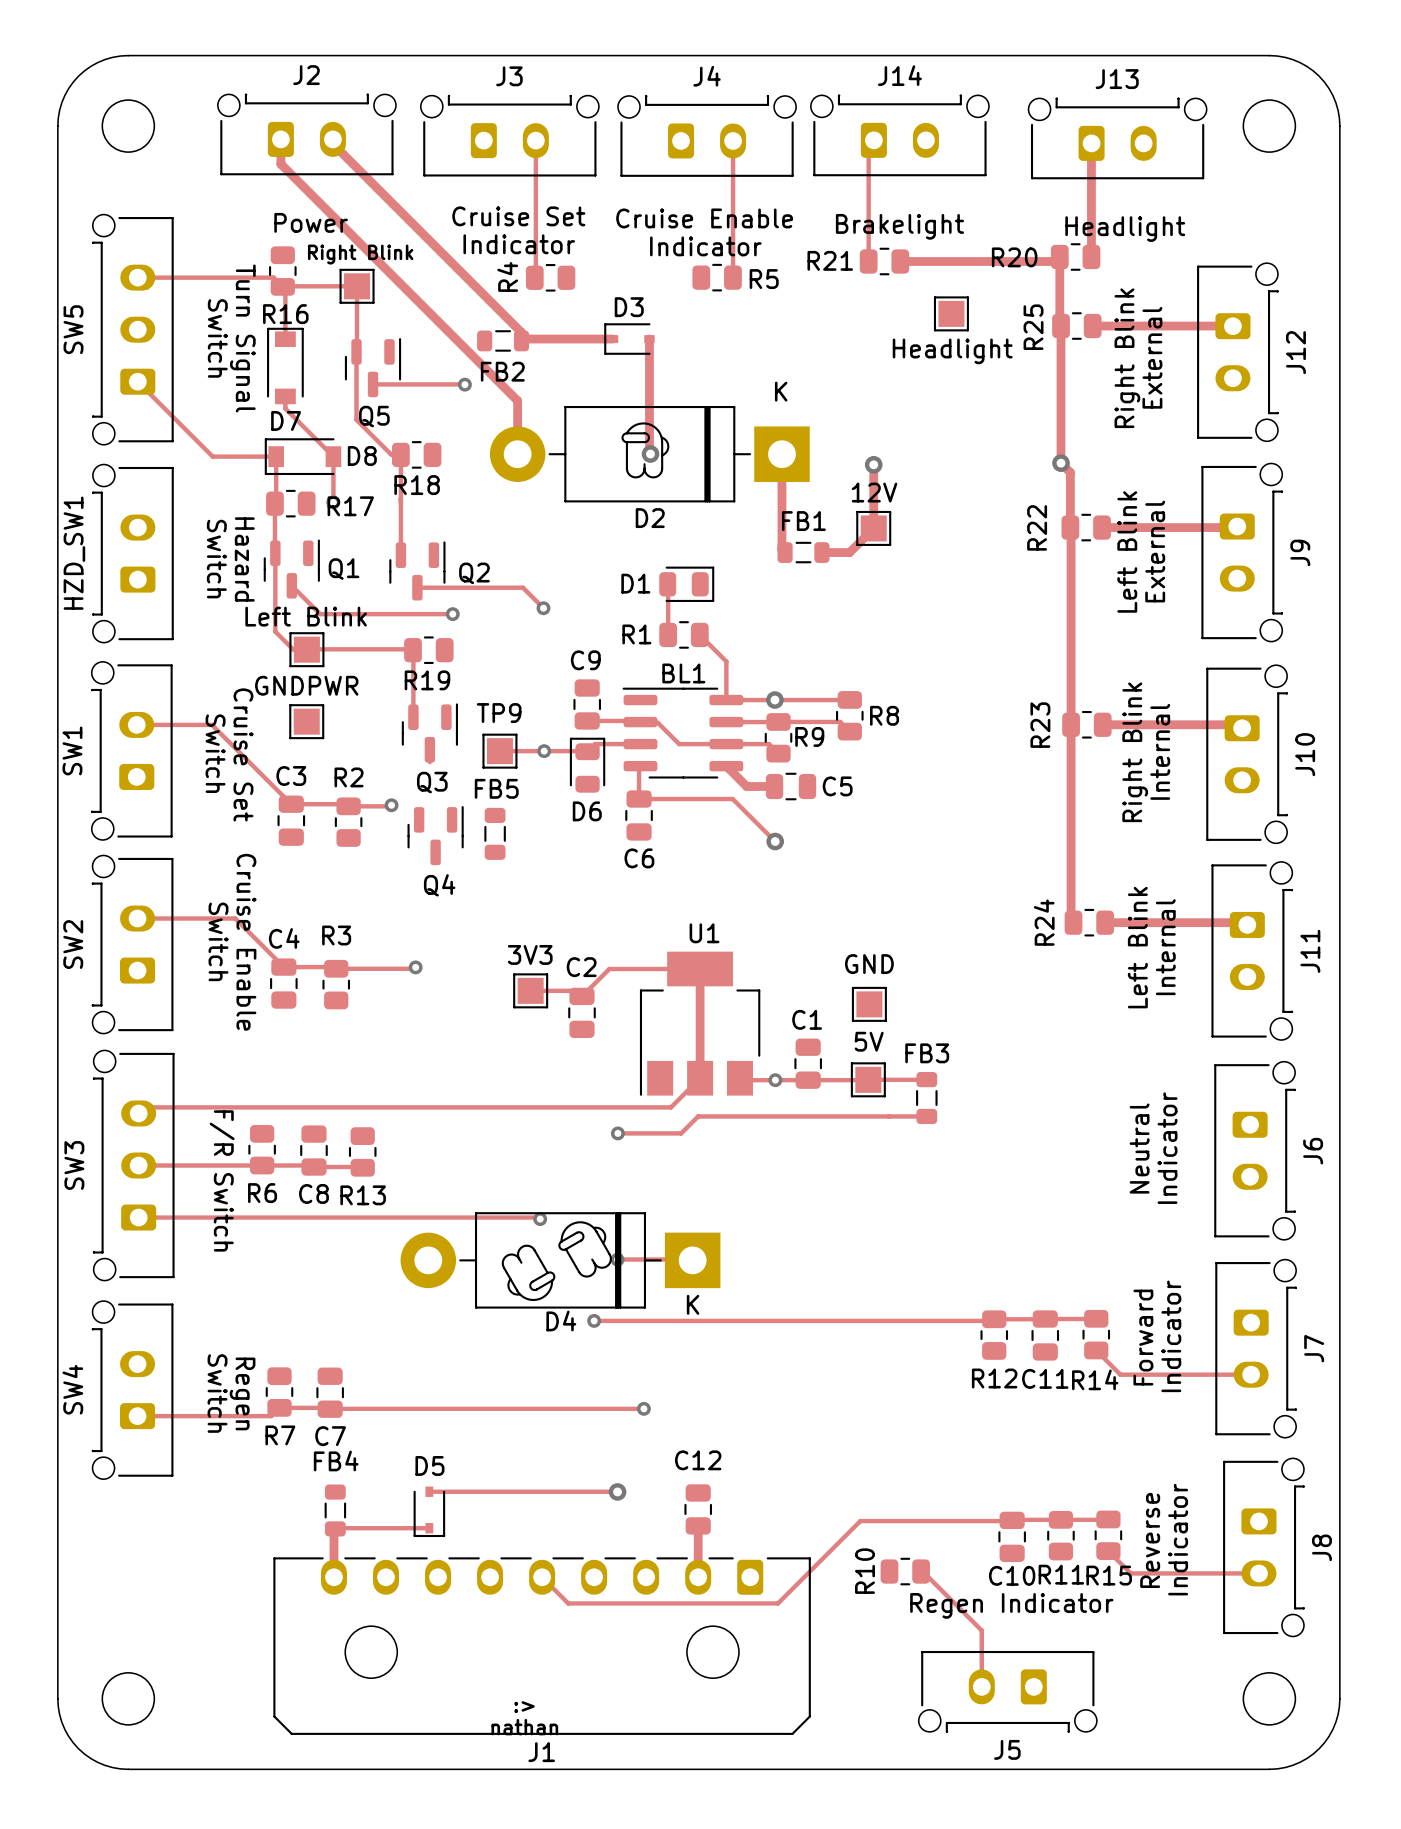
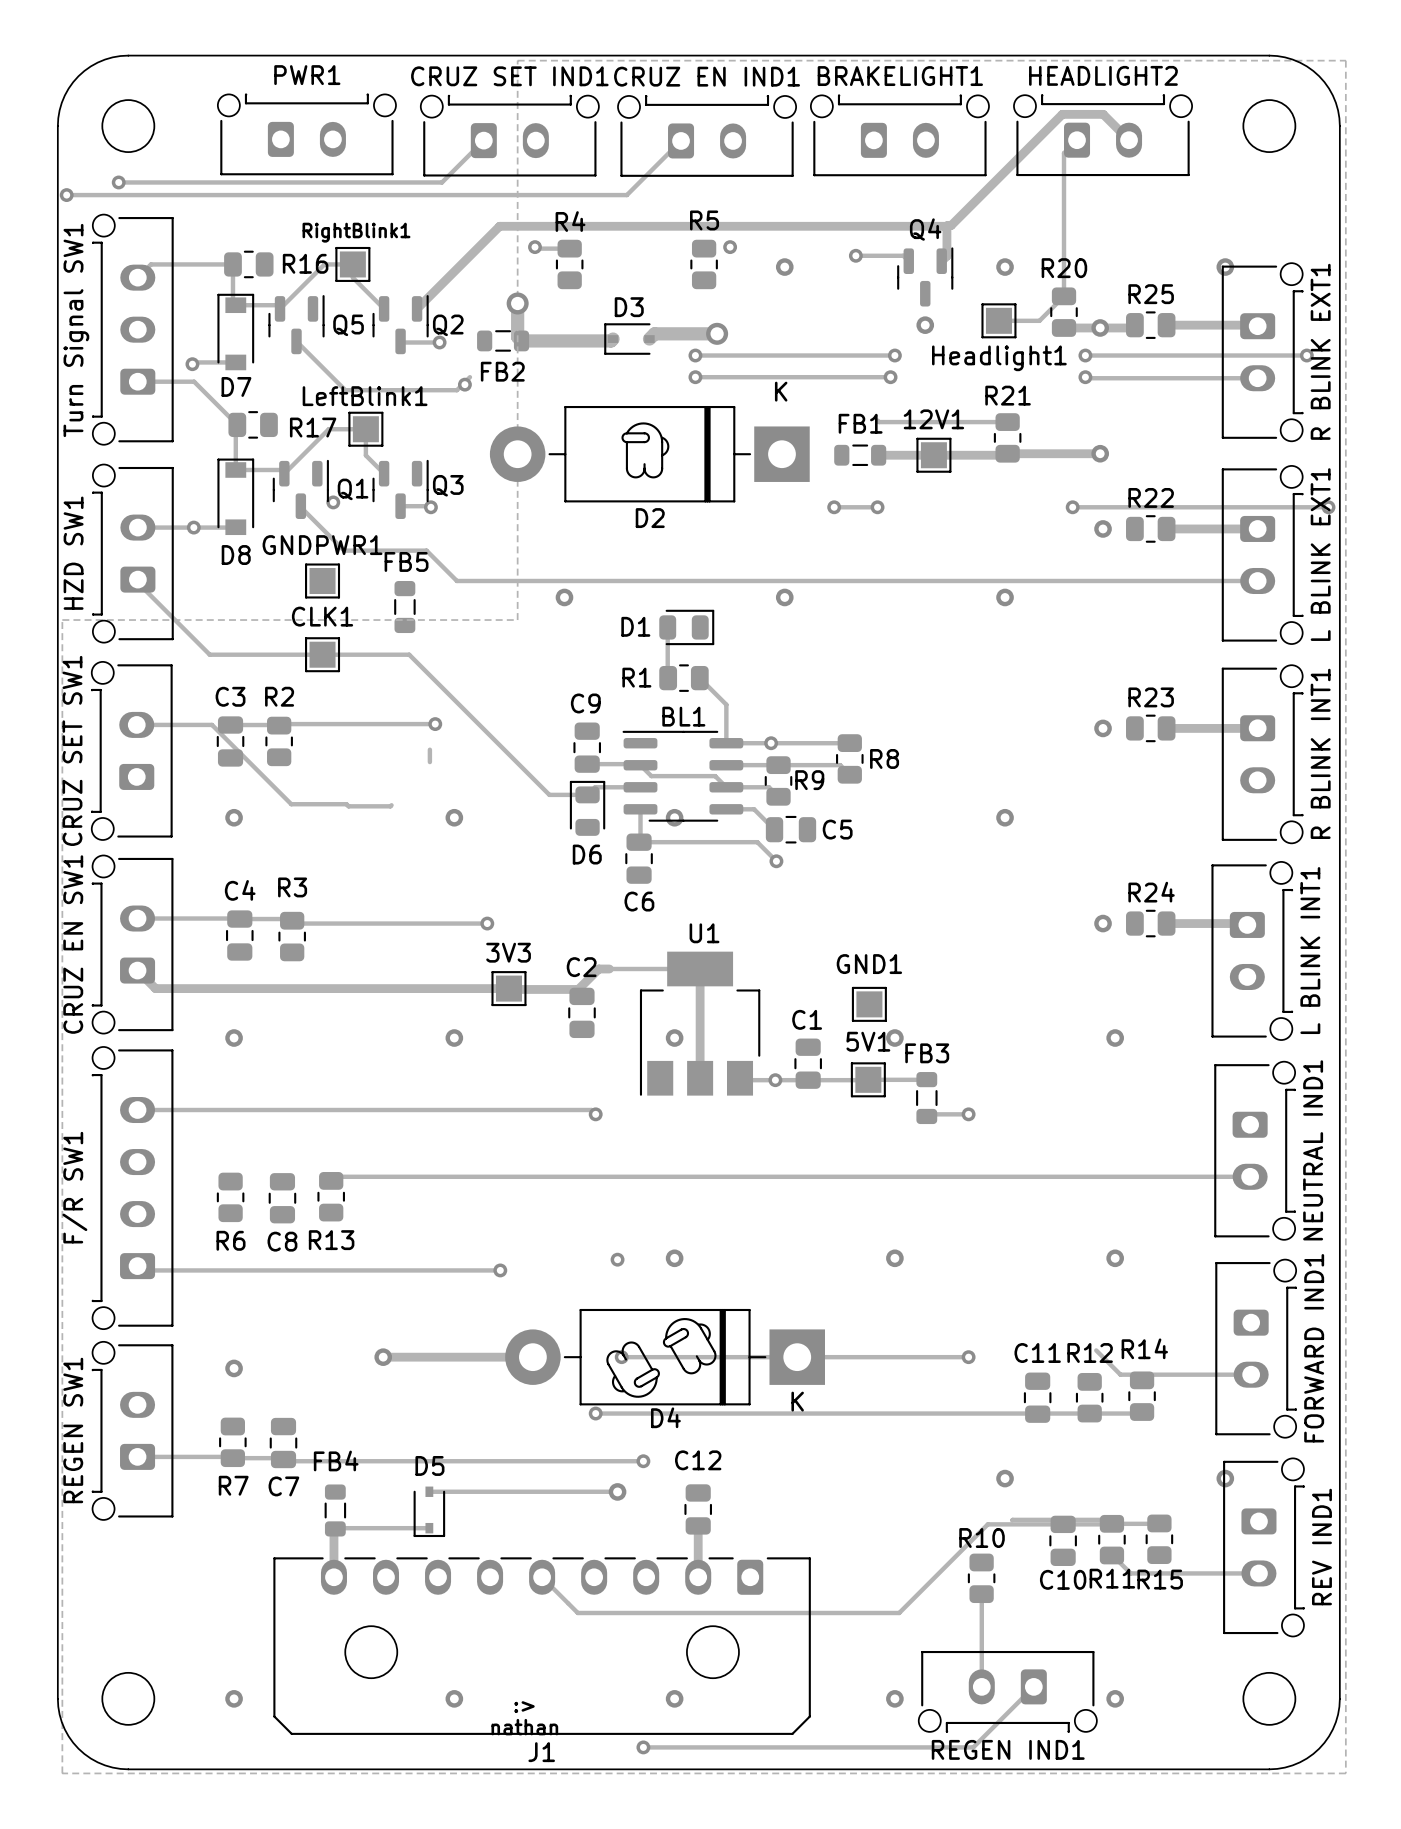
zone outline: none -> (517, 60) (517, 620) (62, 620) (62, 1773) (1345, 1773) (1345, 60) (517, 60)
J2 name: J2 (306, 75) -> PWR1 (307, 75)
J14 name: J14 (899, 75) -> BRAKELIGHT1 (900, 76)
J3 name: J3 (509, 76) -> CRUZ SET IND1 (509, 76)
J4 name: J4 (707, 76) -> CRUZ EN IND1 (707, 76)
J13 name: J13 (1117, 79) -> HEADLIGHT2 (1103, 75)
J13 position: (1117, 138) -> (1103, 135)
track: (280, 139) (280, 164) (517, 400) (517, 454) -> none
track: none -> (483, 140) (441, 182) (118, 182)
track: (535, 140) (534, 277) -> none
track: none -> (681, 140) (626, 195) (66, 195)
track: (733, 140) (733, 277) -> none
track: (873, 140) (868, 145) (868, 261) -> none
track: none -> (1077, 140) (1064, 153) (1064, 296) (1039, 320) (998, 320)
track: none -> (1129, 140) (1103, 114) (1062, 114) (951, 225) (946, 226)
track: (332, 143) (521, 332) (521, 340) (523, 339) (613, 339) -> (517, 303) (517, 337) (521, 340) (611, 340) (613, 339)
track: (1091, 143) (1091, 256) -> none
via: none -> (118, 182)
via: none -> (66, 195)
text: Cruise Set (518, 216) -> none
text: Cruise Enable (704, 218) -> none
text: Power (311, 222) -> none
text: Brakelight (899, 226) -> none
track: none -> (946, 226) (499, 226) (417, 308)
track: none -> (946, 226) (946, 256) (941, 261)
text: Headlight (1125, 229) -> none
text: Indicator (519, 244) -> none
text: Indicator (705, 246) -> none
track: none -> (534, 247) (569, 248)
via: none -> (534, 247)
via: none -> (730, 247)
track: none -> (855, 255) (903, 255) (908, 261)
via: none -> (855, 255)
R20 rotation: 0° (1075, 256) -> 90° clockwise (1064, 312)
R20 position: (1075, 256) -> (1064, 312)
R21 rotation: 0° (884, 261) -> 90° clockwise (1007, 437)
R21 position: (884, 261) -> (1007, 437)
track: (900, 261) (1055, 261) (1059, 256) (1061, 463) (1070, 472) (1070, 527) -> none
RightBlink1: none -> (352, 264)
via: none -> (784, 267)
via: none -> (1005, 267)
via: none -> (1225, 267)
R16 rotation: 0° (282, 271) -> 90° clockwise (248, 264)
R16 position: (282, 271) -> (248, 264)
track: none -> (137, 277) (150, 264) (232, 264) (232, 302) (235, 305) (276, 305) (280, 308) (324, 264) (352, 264) (352, 277) (384, 308)
R4 rotation: 0° (550, 277) -> 90° clockwise (569, 264)
R5 rotation: 0° (717, 277) -> 90° clockwise (704, 264)
R5 name position: R5 (764, 279) -> R5 (704, 220)
track: (282, 286) (357, 286) (357, 351) -> none
Right Blink: (357, 286) -> none
track: (147, 287) (137, 277) (273, 277) (285, 289) (285, 339) -> none
via: none -> (517, 303)
Headlight: (951, 313) -> none
R16 name position: R16 (285, 314) -> R16 (305, 263)
Headlight1: none -> (998, 320)
via: none -> (925, 325)
track: none -> (1134, 325) (1132, 327) (1064, 327)
track: none -> (1166, 325) (1257, 326)
R25 position: (1076, 326) -> (1150, 325)
track: (1092, 326) (1232, 326) -> none
R25 name rotation: 0° (1033, 327) -> 90° clockwise (1151, 294)
via: none -> (1100, 327)
SW5 name: SW5 (73, 329) -> Turn Signal SW1 (76, 330)
via: none -> (717, 333)
text: Switch (217, 338) -> none
text: Turn Signal (242, 338) -> none
track: (649, 339) (650, 454) -> (649, 339) (654, 333) (717, 333)
track: none -> (296, 341) (345, 390) (456, 390) (469, 377)
track: none -> (400, 341) (439, 342)
via: none -> (439, 342)
track: (356, 351) (356, 419) (391, 454) (400, 454) (400, 555) -> none
J12: (1237, 352) -> none
R BLINK EXT1: none -> (1262, 352)
track: none -> (695, 355) (894, 355)
via: none -> (695, 355)
via: none -> (894, 355)
track: none -> (1085, 355) (1306, 355)
via: none -> (1085, 355)
via: none -> (1306, 355)
text: External (1152, 357) -> none
text: Right Blink (1127, 358) -> none
track: none -> (235, 362) (194, 362) (192, 364)
via: none -> (192, 364)
D7 position: (285, 366) -> (235, 332)
Q5 position: (373, 367) -> (296, 324)
track: none -> (695, 377) (890, 377)
via: none -> (695, 377)
via: none -> (890, 377)
track: none -> (1085, 377) (1257, 378)
via: none -> (1085, 377)
track: (137, 381) (212, 456) (276, 456) (275, 631) (293, 649) (412, 649) (413, 717) -> (137, 381) (194, 381) (237, 424) (235, 469) (280, 469) (284, 473) (328, 429) (365, 429) (365, 455) (384, 473)
track: (373, 384) (464, 384) -> none
track: (285, 396) (285, 408) (333, 456) (333, 502) -> none
Q5 name position: Q5 (374, 416) -> Q5 (348, 325)
track: none -> (877, 420) (1007, 422)
LeftBlink1: none -> (365, 429)
track: none -> (1100, 453) (878, 455)
via: none -> (1100, 453)
R18: (416, 454) -> none
via: (650, 454) -> none
track: (781, 454) (781, 549) (785, 552) -> none
12V1: none -> (933, 455)
D8 rotation: 0° (303, 456) -> 90° clockwise (235, 496)
D8 position: (303, 456) -> (235, 496)
via: (1061, 463) -> none
track: (873, 464) (873, 528) (849, 552) (821, 552) -> none
via: (873, 464) -> none
R17 position: (290, 503) -> (253, 424)
track: none -> (300, 506) (344, 550) (426, 550) (456, 580) (1257, 580)
track: none -> (400, 506) (430, 507)
via: none -> (430, 507)
track: none -> (834, 507) (877, 507)
via: none -> (834, 507)
via: none -> (877, 507)
track: none -> (1072, 507) (1328, 507)
via: none -> (1072, 507)
via: none -> (1328, 507)
track: (1236, 526) (1236, 527) (1102, 527) -> none
via: none -> (193, 527)
track: none -> (235, 527) (137, 527)
R22 name rotation: 0° (1037, 527) -> 90° clockwise (1151, 497)
R22 position: (1086, 527) -> (1150, 528)
12V: (873, 528) -> none
via: none -> (1103, 528)
track: none -> (1166, 528) (1257, 528)
track: (1071, 533) (1071, 920) (1073, 922) -> none
text: Left Blink (1127, 551) -> none
text: External (1155, 551) -> none
FB1 position: (803, 552) -> (860, 455)
J9: (1242, 552) -> none
HZD_SW1 name: HZD_SW1 (74, 553) -> HZD SW1 (73, 553)
L BLINK EXT1: none -> (1262, 554)
text: Switch (216, 559) -> none
text: Hazard (244, 559) -> none
Q1 position: (291, 569) -> (300, 489)
Q2 position: (417, 570) -> (400, 324)
Q2 name position: Q2 (474, 573) -> Q2 (448, 325)
track: none -> (137, 579) (137, 582) (209, 654) (409, 654) (549, 794) (587, 794) (595, 787) (640, 787)
GNDPWR1: none -> (322, 580)
track: (667, 584) (668, 634) -> none
D1 position: (686, 584) -> (686, 627)
track: (291, 585) (320, 614) (452, 614) -> none
track: (417, 587) (522, 587) (543, 608) -> none
via: none -> (564, 597)
via: none -> (784, 597)
via: none -> (1005, 597)
via: (543, 608) -> none
via: (452, 614) -> none
Left Blink name: Left Blink (306, 616) -> CLK1 (322, 616)
track: none -> (667, 627) (668, 678)
R1 position: (683, 634) -> (683, 678)
track: (699, 634) (726, 661) (726, 700) (840, 700) -> none
Left Blink position: (306, 649) -> (322, 654)
R19: (428, 650) -> none
track: none -> (699, 678) (726, 704) (726, 743) (849, 743)
via: (774, 700) -> none
C9 position: (587, 704) -> (587, 747)
R8 position: (849, 715) -> (849, 758)
track: (587, 720) (640, 722) -> none
GNDPWR: (306, 721) -> none
track: (778, 721) (840, 721) (849, 731) -> none
track: (657, 722) (679, 744) (769, 744) (778, 753) -> none
track: (726, 722) (778, 722) -> none
track: none -> (435, 724) (230, 725)
via: none -> (435, 724)
R23 position: (1086, 724) -> (1150, 728)
track: (1102, 724) (1238, 724) (1242, 728) -> none
R23 name rotation: 0° (1040, 725) -> 90° clockwise (1151, 697)
via: none -> (1103, 728)
track: none -> (1166, 728) (1257, 728)
Q3 position: (429, 732) -> (400, 489)
BL1 position: (682, 733) -> (682, 776)
R9 position: (778, 737) -> (778, 780)
via: none -> (771, 743)
track: (640, 744) (595, 744) (587, 751) (499, 751) -> none
SW1 name: SW1 (72, 750) -> CRUZ SET SW1 (72, 750)
TP9: (499, 751) -> none
via: (544, 751) -> none
text: Internal (1160, 751) -> none
text: Right Blink (1135, 752) -> none
text: Switch (215, 753) -> none
text: Cruise Set (243, 754) -> none
J10 position: (1247, 754) -> (1262, 754)
J10 name: J10 (1305, 754) -> R BLINK INT1 (1320, 753)
track: none -> (587, 764) (639, 764) (651, 776) (715, 776) (726, 787) (769, 787) (778, 796)
D6 position: (587, 765) -> (587, 808)
track: none -> (726, 765) (840, 765) (849, 774)
track: (640, 766) (639, 799) (732, 799) (774, 841) -> none
track: (726, 766) (746, 786) (774, 786) -> none
Q3 name position: Q3 (432, 782) -> Q3 (448, 485)
C5 position: (791, 786) -> (791, 829)
via: (391, 805) -> none
track: none -> (640, 809) (639, 842) (757, 842) (776, 861)
track: none -> (726, 809) (754, 809) (774, 829)
C6 position: (639, 815) -> (639, 858)
via: none -> (234, 817)
via: none -> (454, 817)
via: none -> (674, 817)
via: none -> (1005, 817)
C3 position: (291, 820) -> (230, 741)
R2 position: (348, 822) -> (279, 741)
FB5 position: (495, 833) -> (404, 607)
Q4 position: (435, 835) -> (925, 276)
via: (775, 841) -> none
via: none -> (776, 861)
Q4 name position: Q4 (439, 885) -> Q4 (925, 229)
track: (235, 918) (283, 967) (334, 967) (336, 968) (415, 967) -> (235, 918) (290, 919) (294, 923) (487, 923)
R24 name rotation: 0° (1044, 922) -> 90° clockwise (1151, 892)
R24 position: (1089, 922) -> (1150, 923)
track: (1105, 922) (1245, 922) (1247, 924) -> none
via: none -> (487, 923)
via: none -> (1103, 923)
track: none -> (1166, 923) (1257, 924)
text: Switch (218, 941) -> none
text: Cruise Enable (246, 942) -> none
SW2 name: SW2 (73, 944) -> CRUZ EN SW1 (73, 944)
text: Left Blink (1137, 947) -> none
text: Internal (1165, 947) -> none
J11 name: J11 (1310, 951) -> L BLINK INT1 (1310, 950)
GND name: GND (869, 964) -> GND1 (869, 964)
via: (415, 967) -> none
track: (609, 968) (582, 996) (576, 990) (530, 990) -> (609, 968) (598, 968) (578, 989) (155, 988) (137, 970)
C4 position: (283, 983) -> (239, 935)
R3 position: (336, 984) -> (292, 936)
3V3 position: (530, 990) -> (508, 988)
via: none -> (234, 1038)
via: none -> (454, 1038)
via: none -> (674, 1038)
via: none -> (894, 1038)
via: none -> (1115, 1038)
5V name: 5V (869, 1041) -> 5V1 (868, 1041)
track: (700, 1078) (670, 1107) (144, 1107) (138, 1113) -> none
track: none -> (137, 1110) (591, 1110) (595, 1114)
via: none -> (968, 1114)
track: (926, 1116) (698, 1116) (681, 1133) (617, 1133) -> (926, 1116) (928, 1114) (968, 1114)
via position: (617, 1133) -> (595, 1114)
text: Neutral (1139, 1148) -> none
text: Indicator (1167, 1148) -> none
R6 position: (262, 1149) -> (230, 1197)
C8 position: (313, 1150) -> (282, 1198)
R13 position: (362, 1151) -> (331, 1196)
J6 name: J6 (1313, 1151) -> NEUTRAL IND1 (1313, 1150)
SW3: (133, 1165) -> none
track: (138, 1165) (312, 1165) (362, 1167) -> none
track: none -> (1257, 1176) (335, 1176) (331, 1180)
text: F/R Switch (222, 1180) -> none
F/R SW1: none -> (132, 1188)
track: (138, 1217) (538, 1217) (540, 1219) -> none
via: (540, 1219) -> none
line: (594, 1227) (599, 1228) (603, 1232) (605, 1237) (603, 1243) -> (698, 1324) (704, 1325) (708, 1329) (709, 1334) (707, 1339)
line: (561, 1241) (577, 1232) (582, 1234) (582, 1239) (565, 1249) -> (666, 1338) (682, 1329) (687, 1331) (686, 1336) (670, 1346)
line: (561, 1241) (559, 1247) (565, 1249) -> (666, 1338) (664, 1344) (670, 1346)
line: (561, 1241) (564, 1230) (570, 1224) (579, 1222) (590, 1225) (596, 1231) (610, 1257) (609, 1263) (605, 1267) (599, 1267) (594, 1263) -> (666, 1338) (667, 1329) (675, 1321) (686, 1319) (694, 1321) (701, 1328) (715, 1354) (714, 1360) (710, 1363) (704, 1364) (699, 1360)
line: (565, 1249) (582, 1275) (587, 1276) (593, 1273) (595, 1268) (594, 1263) -> (670, 1346) (686, 1372) (692, 1373) (697, 1370) (700, 1365) (699, 1360)
line: (519, 1258) (521, 1262) -> (623, 1355) (626, 1359)
line: (519, 1258) (515, 1255) (509, 1254) (504, 1258) (502, 1264) (517, 1290) (523, 1297) (534, 1299) (542, 1297) (549, 1291) (552, 1280) -> (623, 1355) (618, 1351) (612, 1352) (608, 1356) (607, 1361) (621, 1387) (627, 1393) (636, 1396) (647, 1394) (654, 1386) (656, 1377)
line: (519, 1258) (518, 1253) (520, 1248) (524, 1246) (530, 1246) (547, 1273) -> (623, 1355) (622, 1350) (624, 1345) (630, 1342) (635, 1343) (652, 1369)
via: none -> (674, 1258)
via: none -> (894, 1258)
via: none -> (1115, 1258)
line: (592, 1259) (594, 1263) -> (696, 1356) (699, 1360)
track: (617, 1259) (696, 1259) (692, 1260) -> none
D4 position: (560, 1260) -> (665, 1357)
track: none -> (137, 1266) (141, 1270) (500, 1270)
via: none -> (500, 1270)
line: (547, 1273) (531, 1282) (530, 1287) (535, 1289) (552, 1280) -> (652, 1369) (636, 1379) (635, 1384) (640, 1386) (656, 1377)
line: (547, 1273) (553, 1274) (552, 1280) -> (652, 1369) (658, 1371) (656, 1377)
line: (510, 1279) (508, 1284) (509, 1289) (513, 1293) (519, 1294) -> (615, 1375) (613, 1381) (614, 1386) (618, 1390) (623, 1391)
track: (1096, 1319) (994, 1319) (992, 1320) (594, 1320) -> none
via: (594, 1320) -> none
R14 position: (1096, 1334) -> (1142, 1396)
R12 position: (994, 1335) -> (1089, 1397)
C11 position: (1045, 1335) -> (1037, 1397)
text: Indicator (1171, 1336) -> none
text: Forward (1143, 1337) -> none
J7 name: J7 (1314, 1348) -> FORWARD IND1 (1314, 1348)
track: none -> (383, 1357) (532, 1357)
via: none -> (383, 1357)
track: none -> (621, 1357) (968, 1357)
via: none -> (621, 1357)
via: none -> (968, 1357)
via: none -> (234, 1368)
R12 name position: R12 (994, 1378) -> R12 (1090, 1353)
C11 name position: C11 (1045, 1378) -> C11 (1037, 1353)
R14 name position: R14 (1095, 1379) -> R14 (1144, 1348)
SW4: (132, 1390) -> none
R7 position: (279, 1392) -> (232, 1442)
C7 position: (330, 1392) -> (283, 1443)
text: Switch (217, 1393) -> none
text: Regen (242, 1393) -> none
track: (643, 1408) (279, 1407) (271, 1416) (137, 1416) -> none
via: (643, 1408) -> none
track: none -> (1142, 1412) (1037, 1414) (595, 1413)
via: none -> (595, 1413)
REGEN SW1: none -> (132, 1430)
track: none -> (137, 1456) (282, 1458) (285, 1461) (643, 1461)
via: none -> (643, 1461)
via: none -> (1005, 1478)
via: none -> (1225, 1478)
track: (1012, 1521) (860, 1521) (777, 1603) (568, 1603) -> (1159, 1523) (987, 1524) (899, 1613) (577, 1613) (568, 1603)
R11 position: (1060, 1535) -> (1111, 1539)
R15 position: (1108, 1535) -> (1159, 1539)
C10 position: (1012, 1536) -> (1063, 1540)
text: Indicator (1178, 1539) -> none
text: Reverse (1150, 1540) -> none
J8 name: J8 (1321, 1547) -> REV IND1 (1321, 1547)
R10 rotation: 0° (905, 1571) -> 90° clockwise (981, 1578)
R10 position: (905, 1571) -> (981, 1578)
track: (922, 1571) (981, 1630) -> (981, 1594) (981, 1630)
text: Regen Indicator (1011, 1605) -> none
track: none -> (1033, 1686) (973, 1747) (643, 1747)
via: none -> (234, 1698)
via: none -> (454, 1698)
via: none -> (674, 1698)
via: none -> (894, 1698)
via: none -> (1115, 1698)
via: none -> (643, 1747)
J5 name: J5 (1007, 1749) -> REGEN IND1 (1008, 1749)

